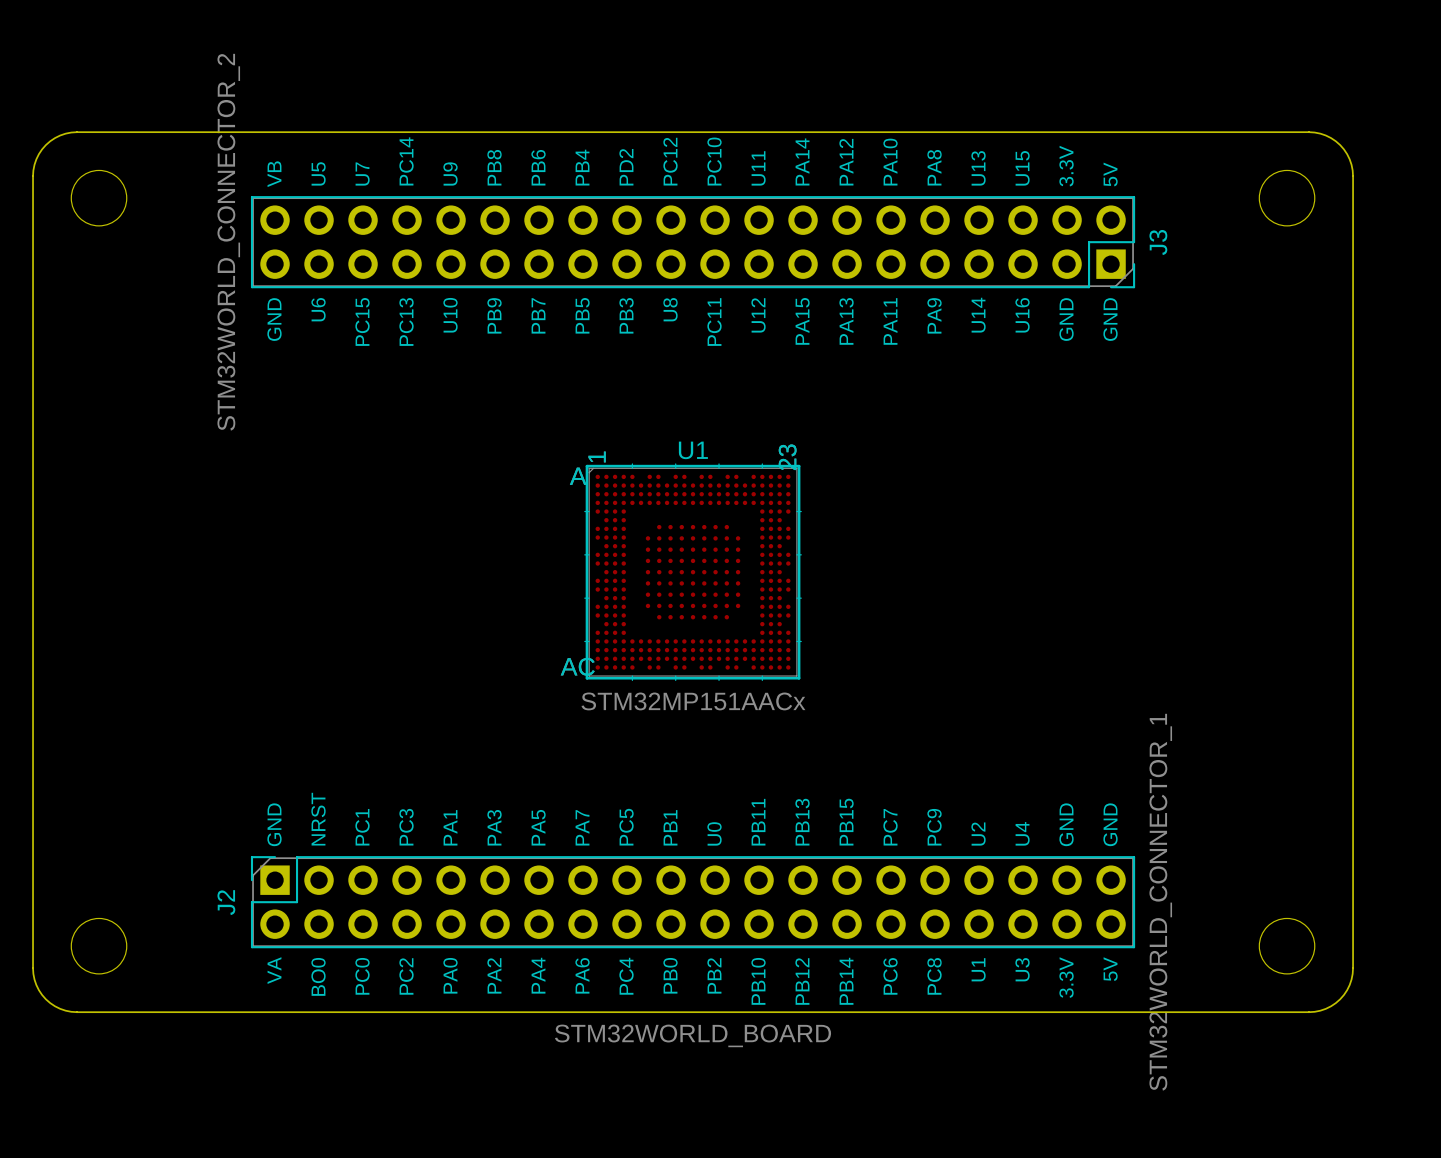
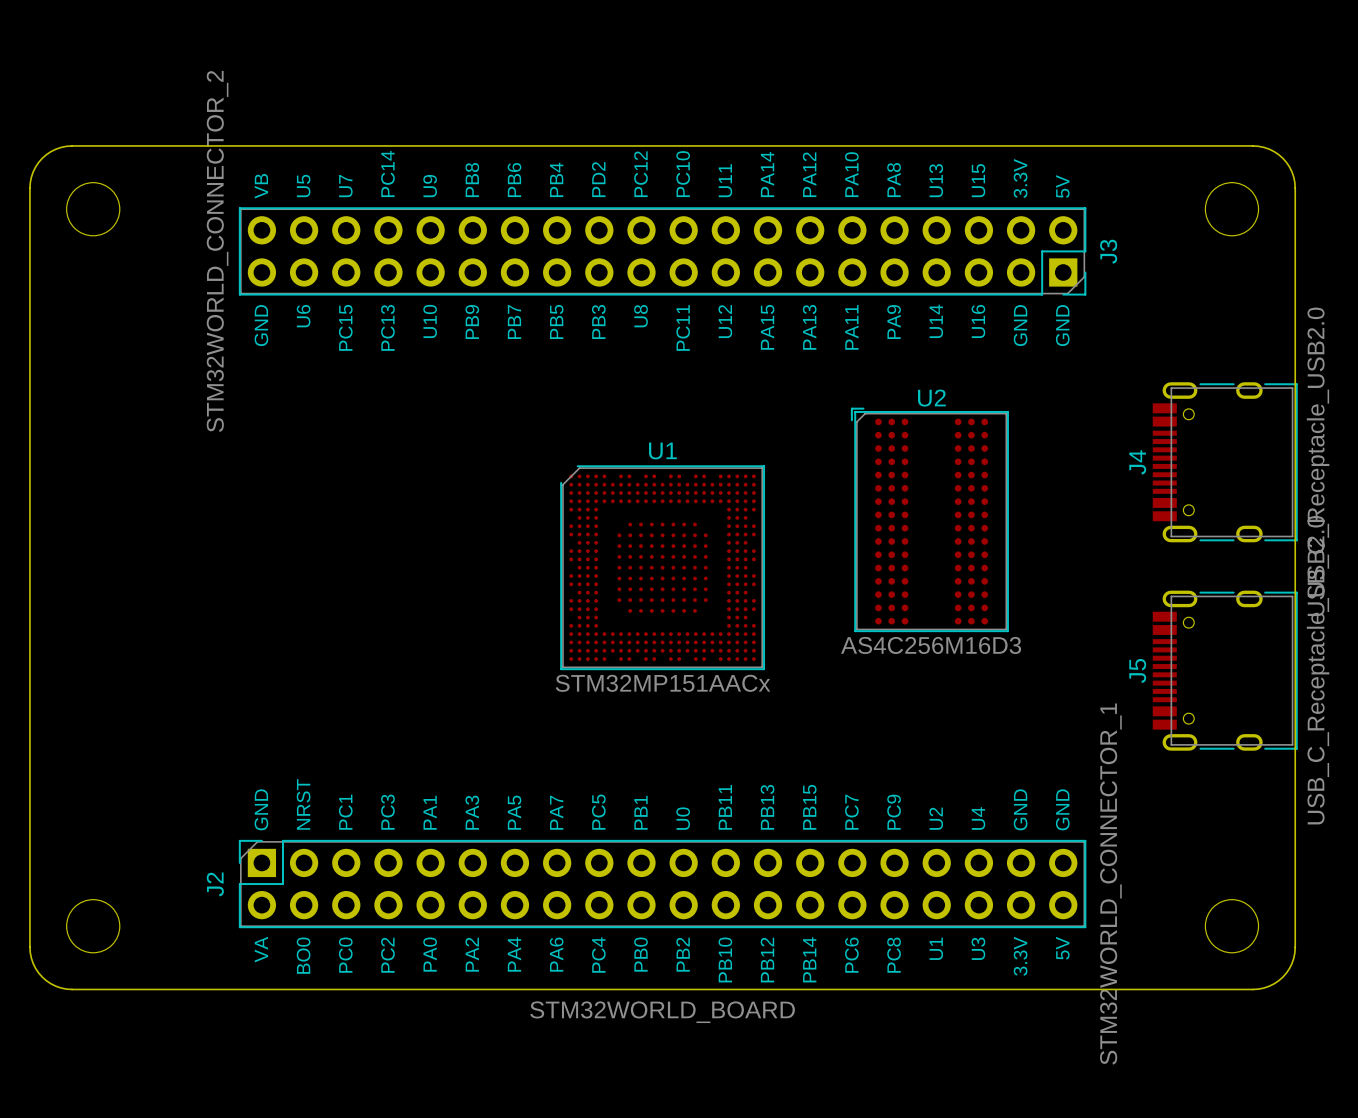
J4: none -> USB_C_Receptacle_USB2.0 (1225, 462)
U1 footprint: [584, 463, 802, 681] -> [560, 465, 766, 671]
U2: none -> AS4C256M16D3 (929, 519)
J5: none -> USB_C_Receptacle_USB2.0 (1225, 670)

